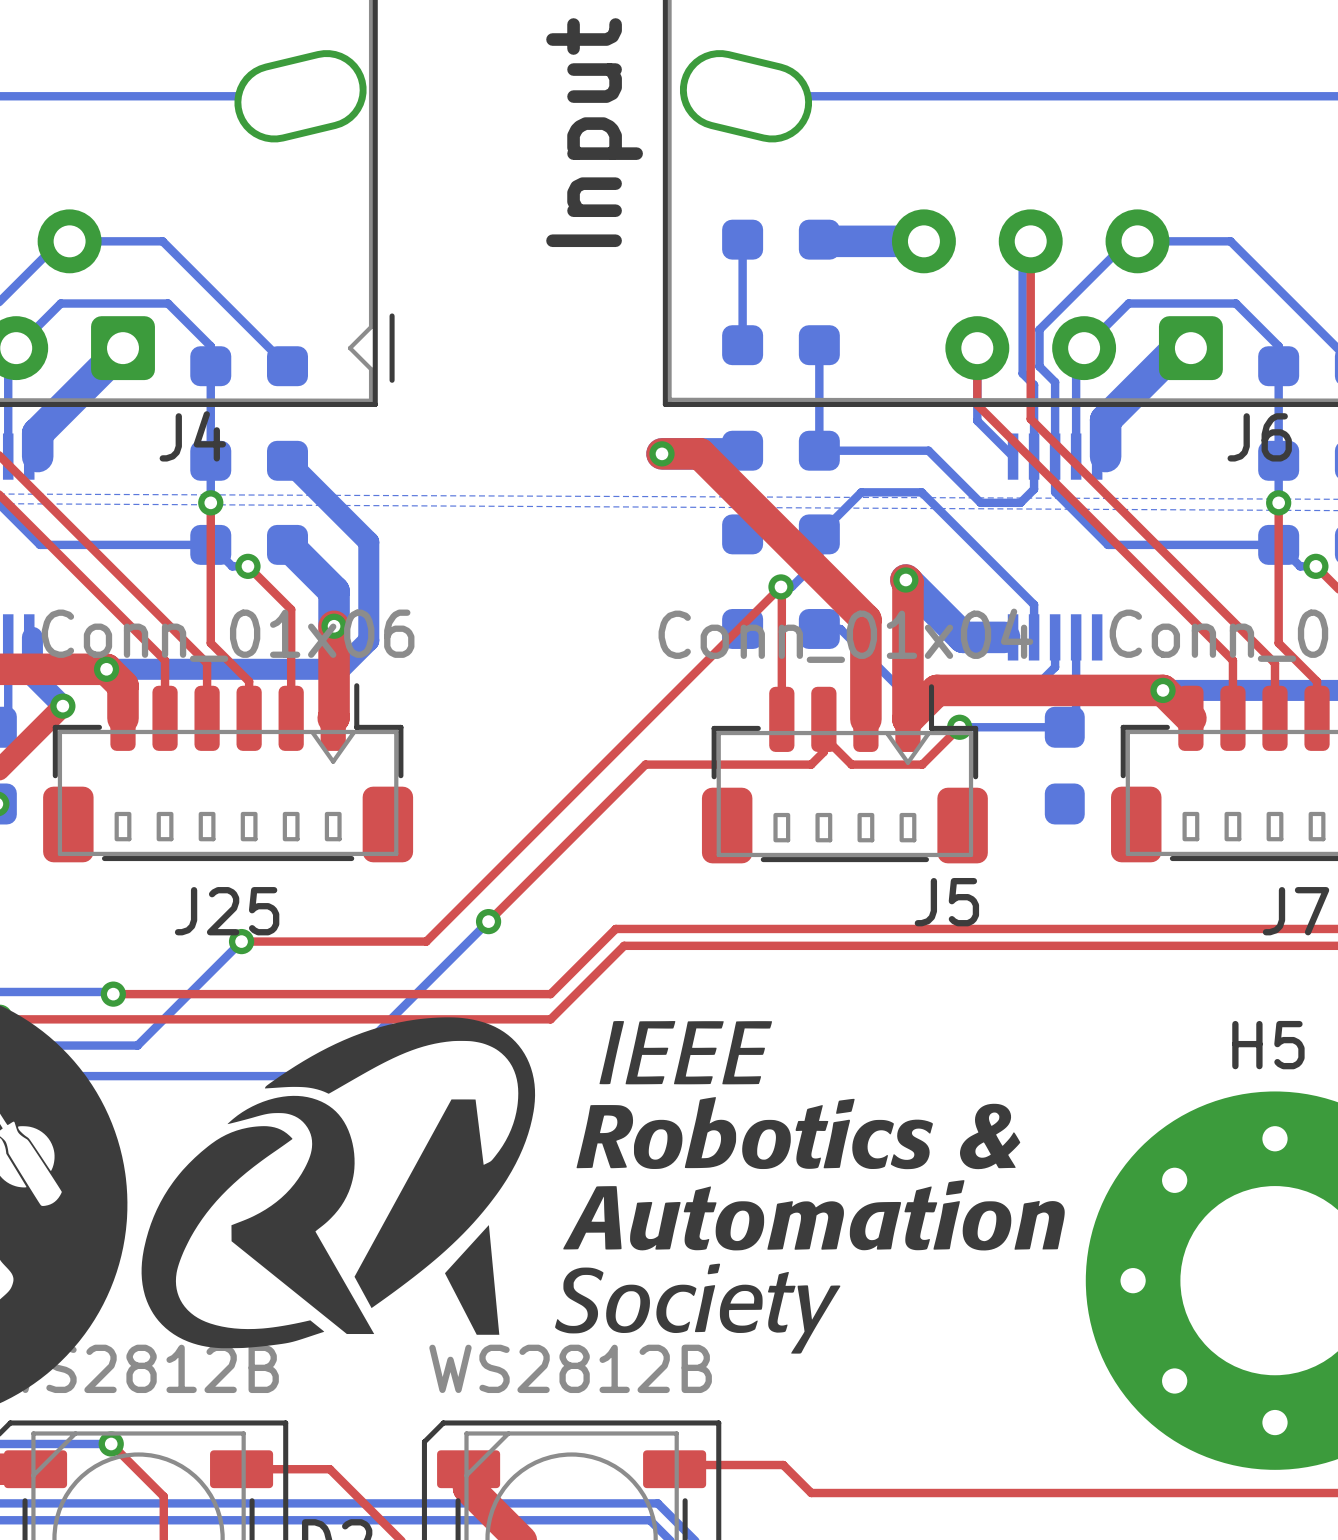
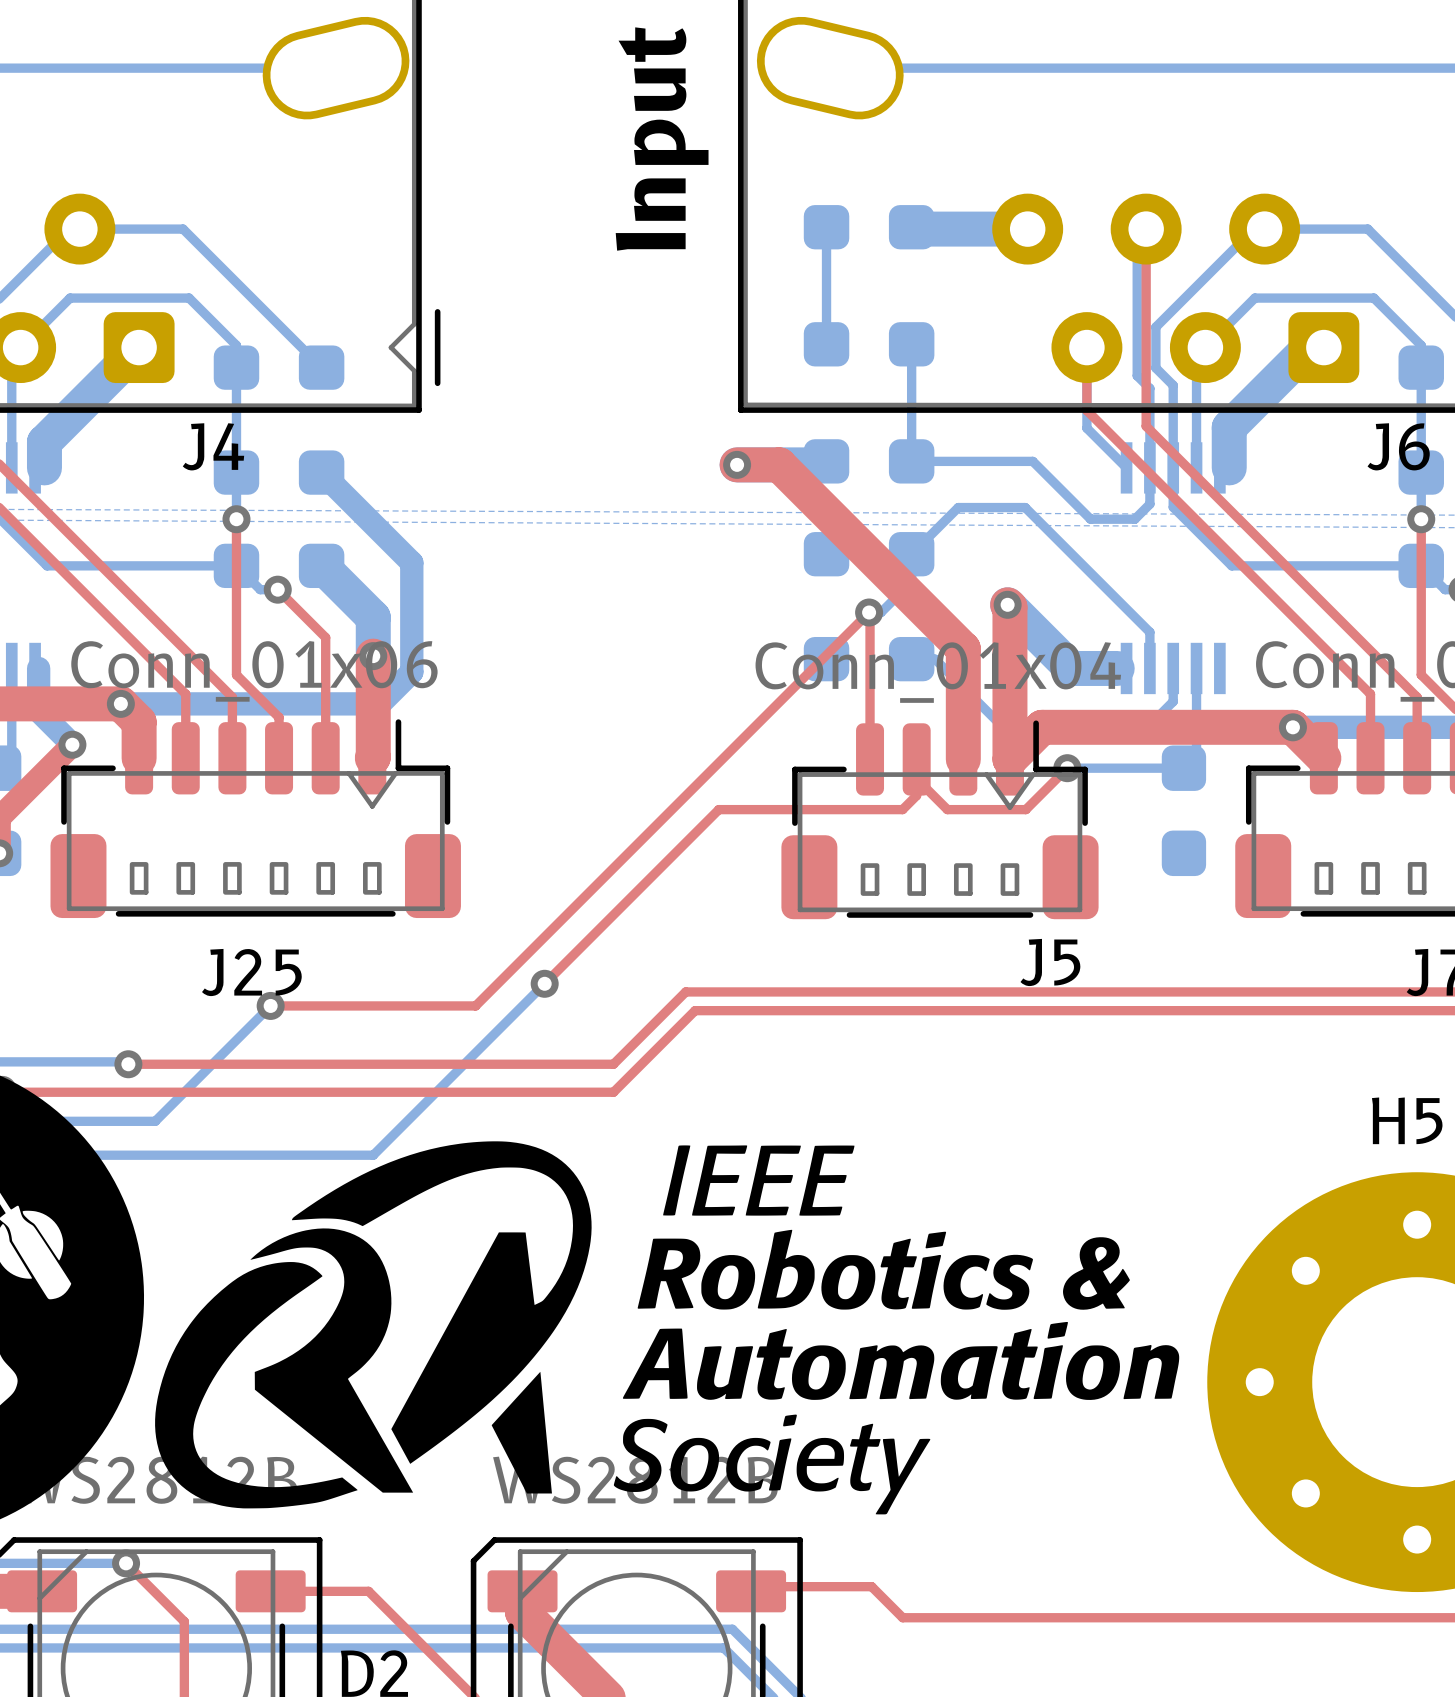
drawing position: (603, 1185) -> (667, 1327)

